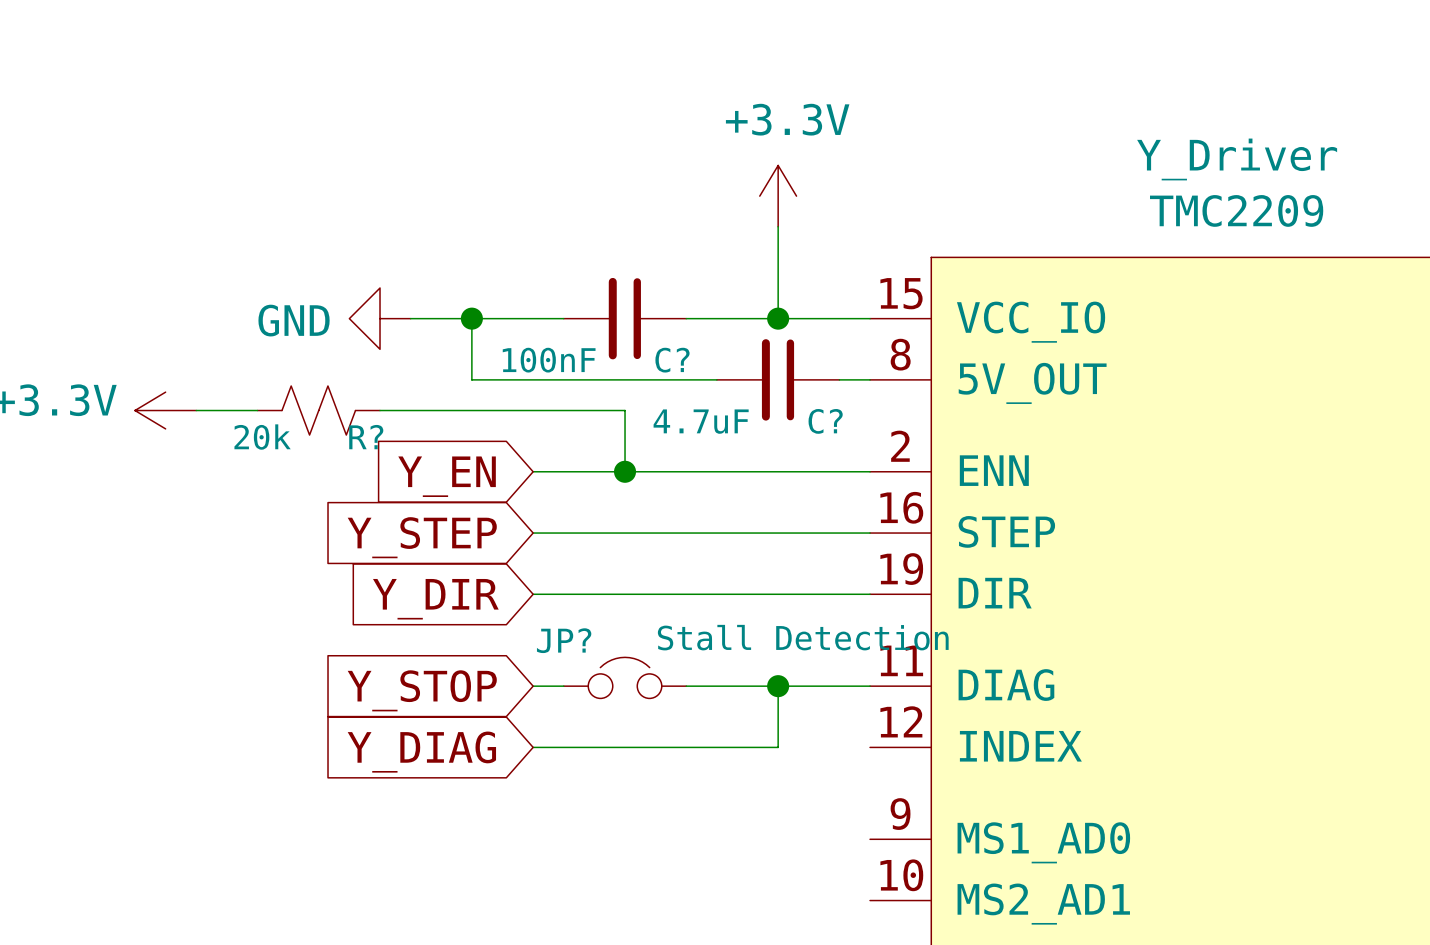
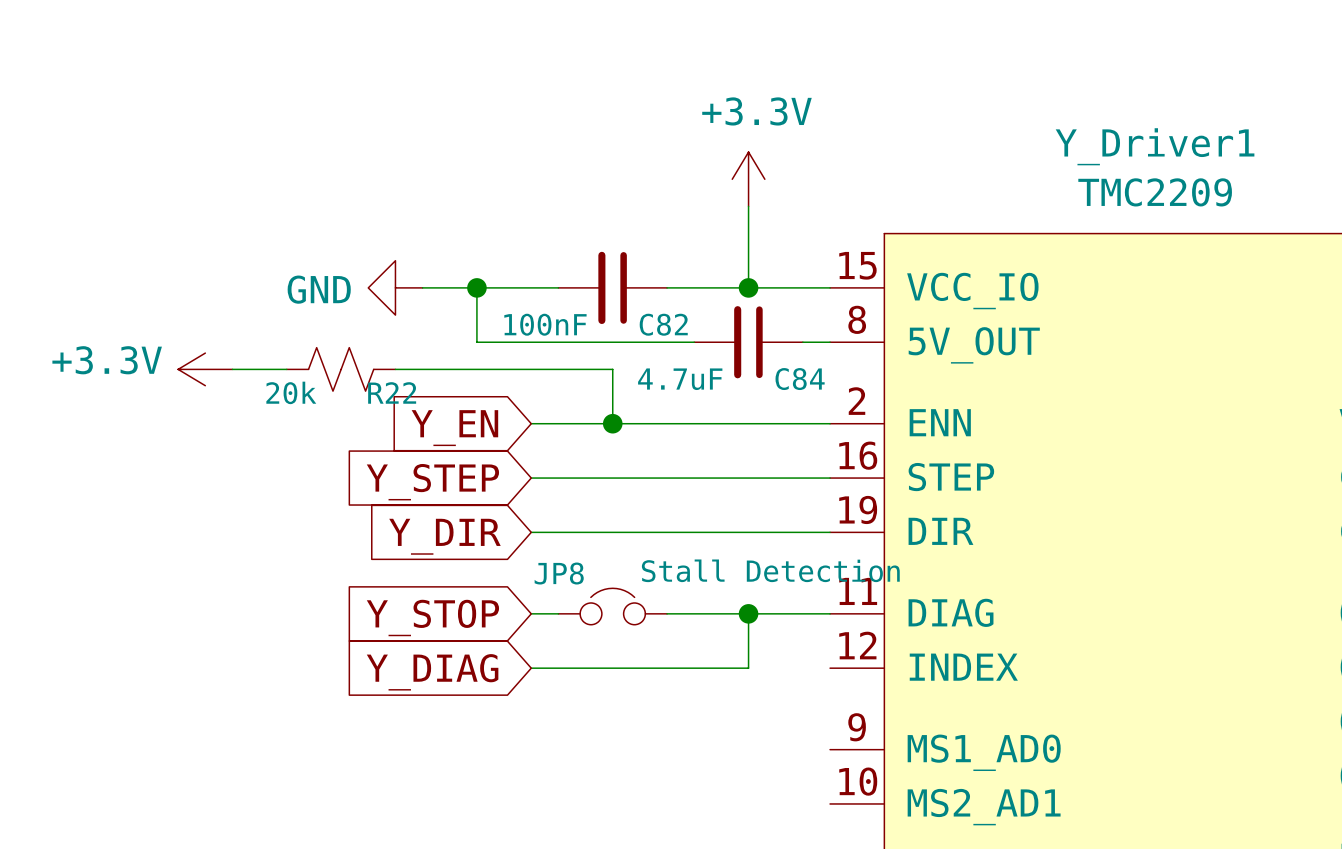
Y_Driver name: Y_Driver (1237, 159) -> Y_Driver1 (1155, 146)
C? name: C? (672, 360) -> C82 (663, 324)
C? name: C? (825, 421) -> C84 (800, 379)
R? name: R? (366, 437) -> R22 (392, 392)
JP? name: JP? (564, 640) -> JP8 (559, 573)

